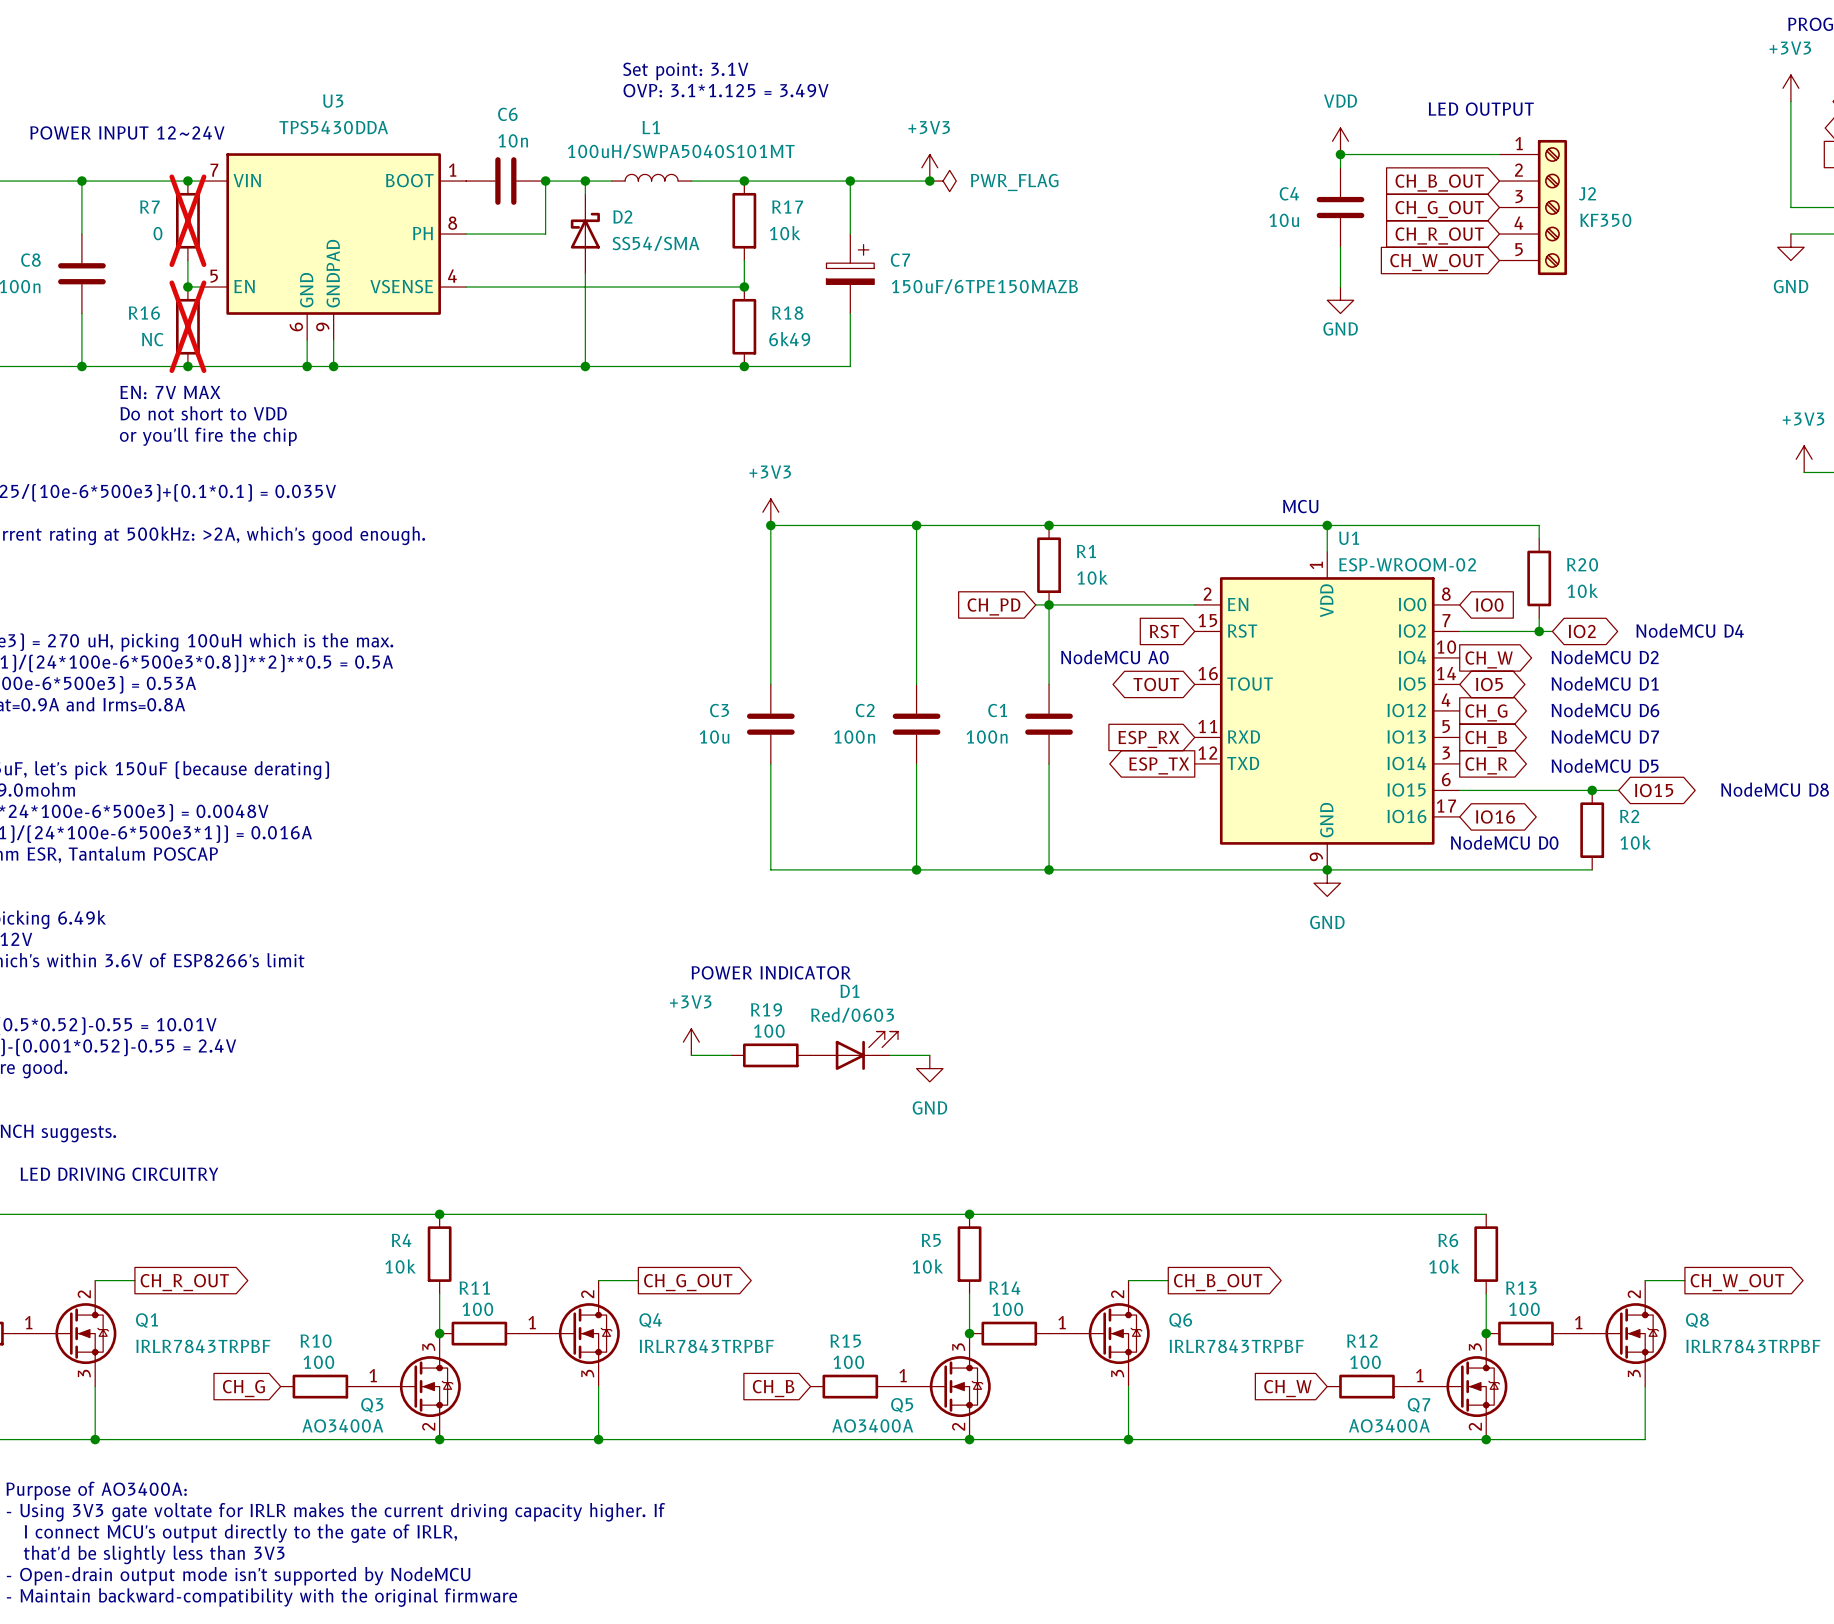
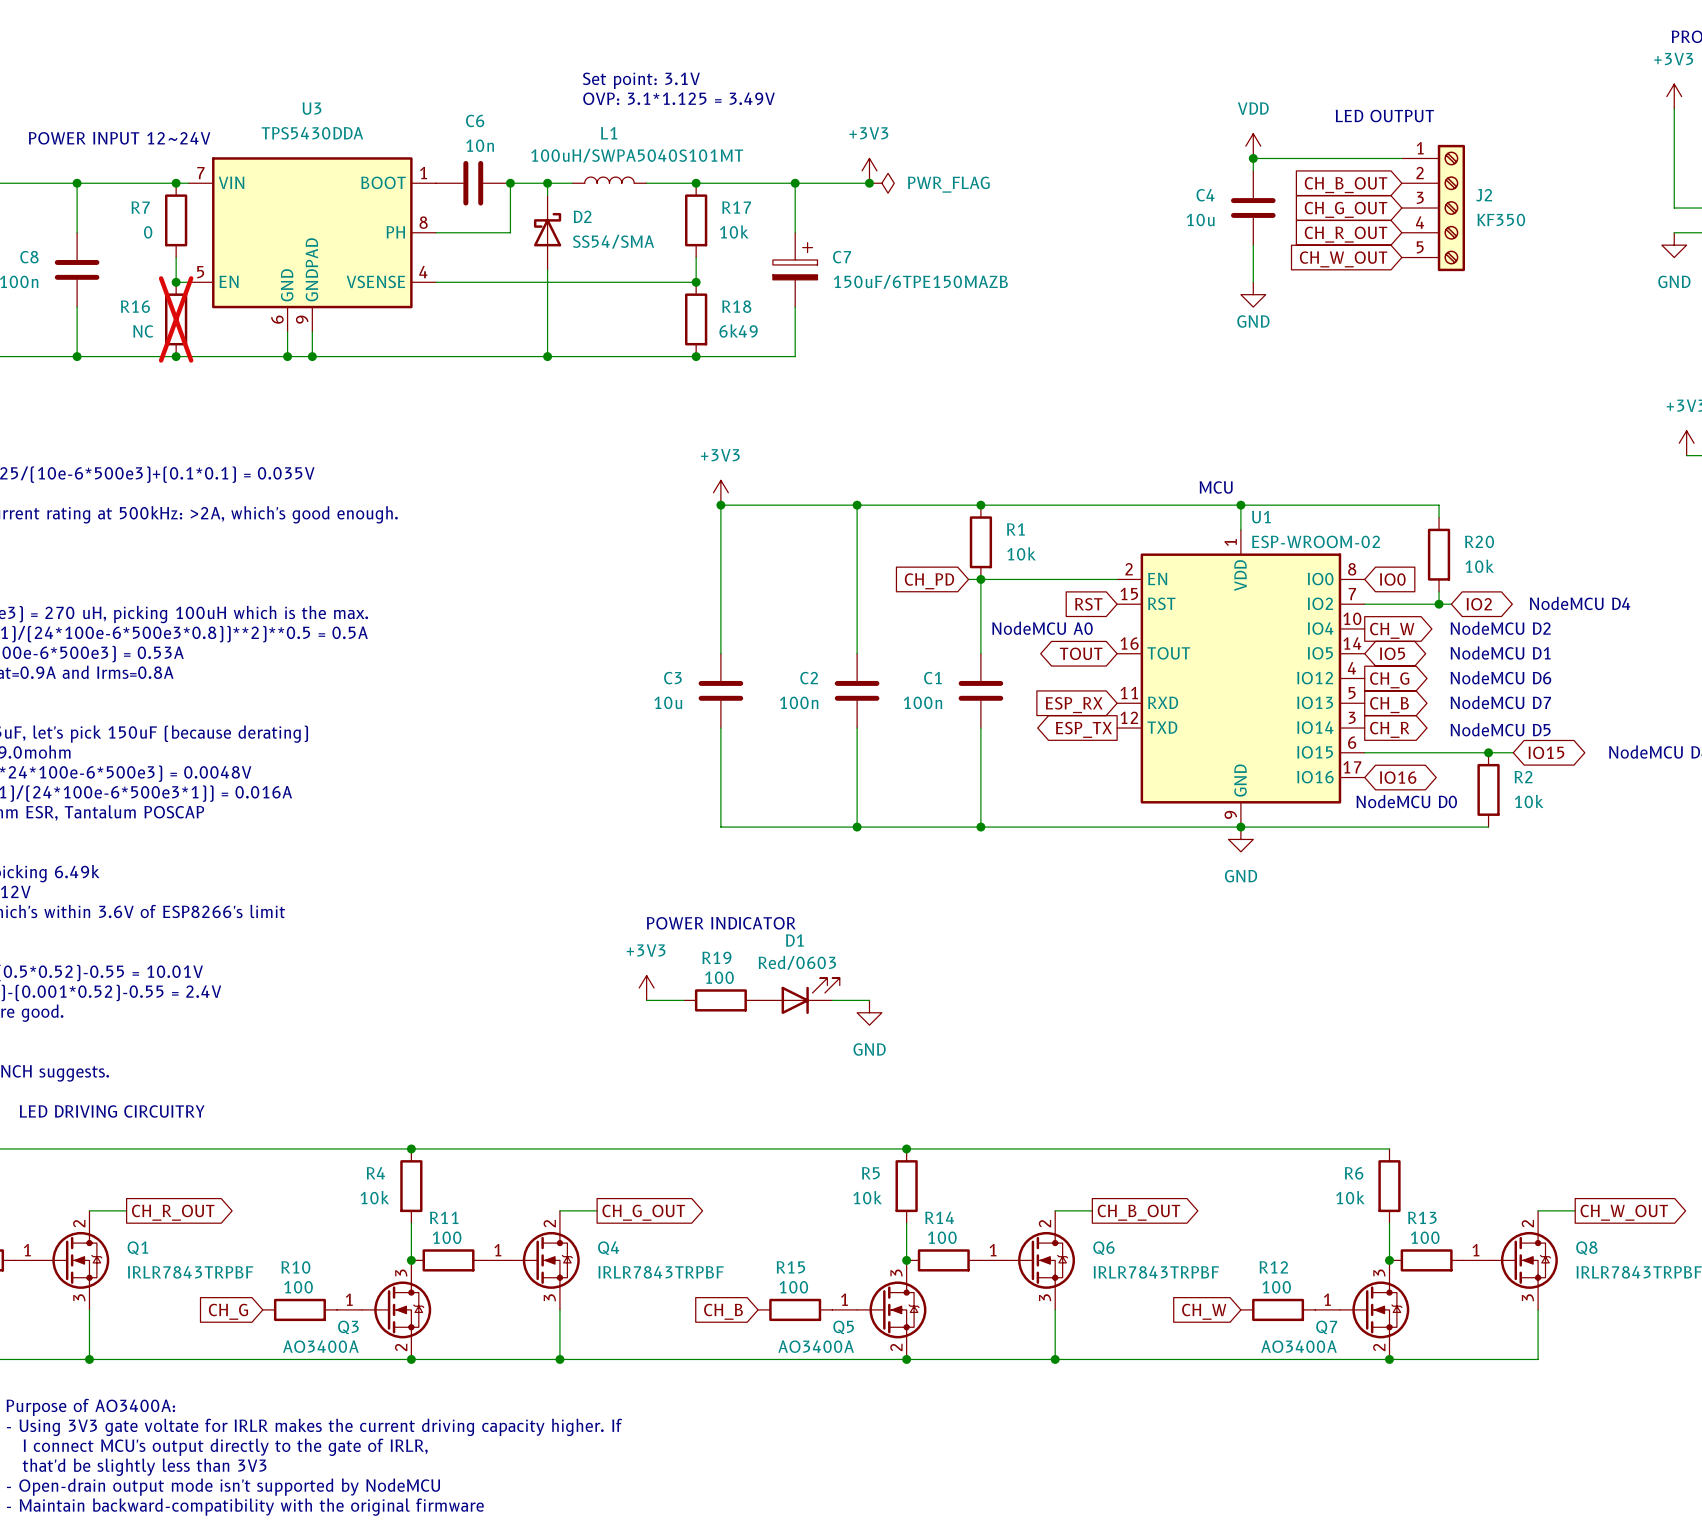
R7 do-not-place cross: (187, 220) -> none
text: EN: 7V MAX (170, 392) -> none
text: Do not short to VDD (203, 413) -> none
text: or you'll fire the chip (208, 436) -> none

